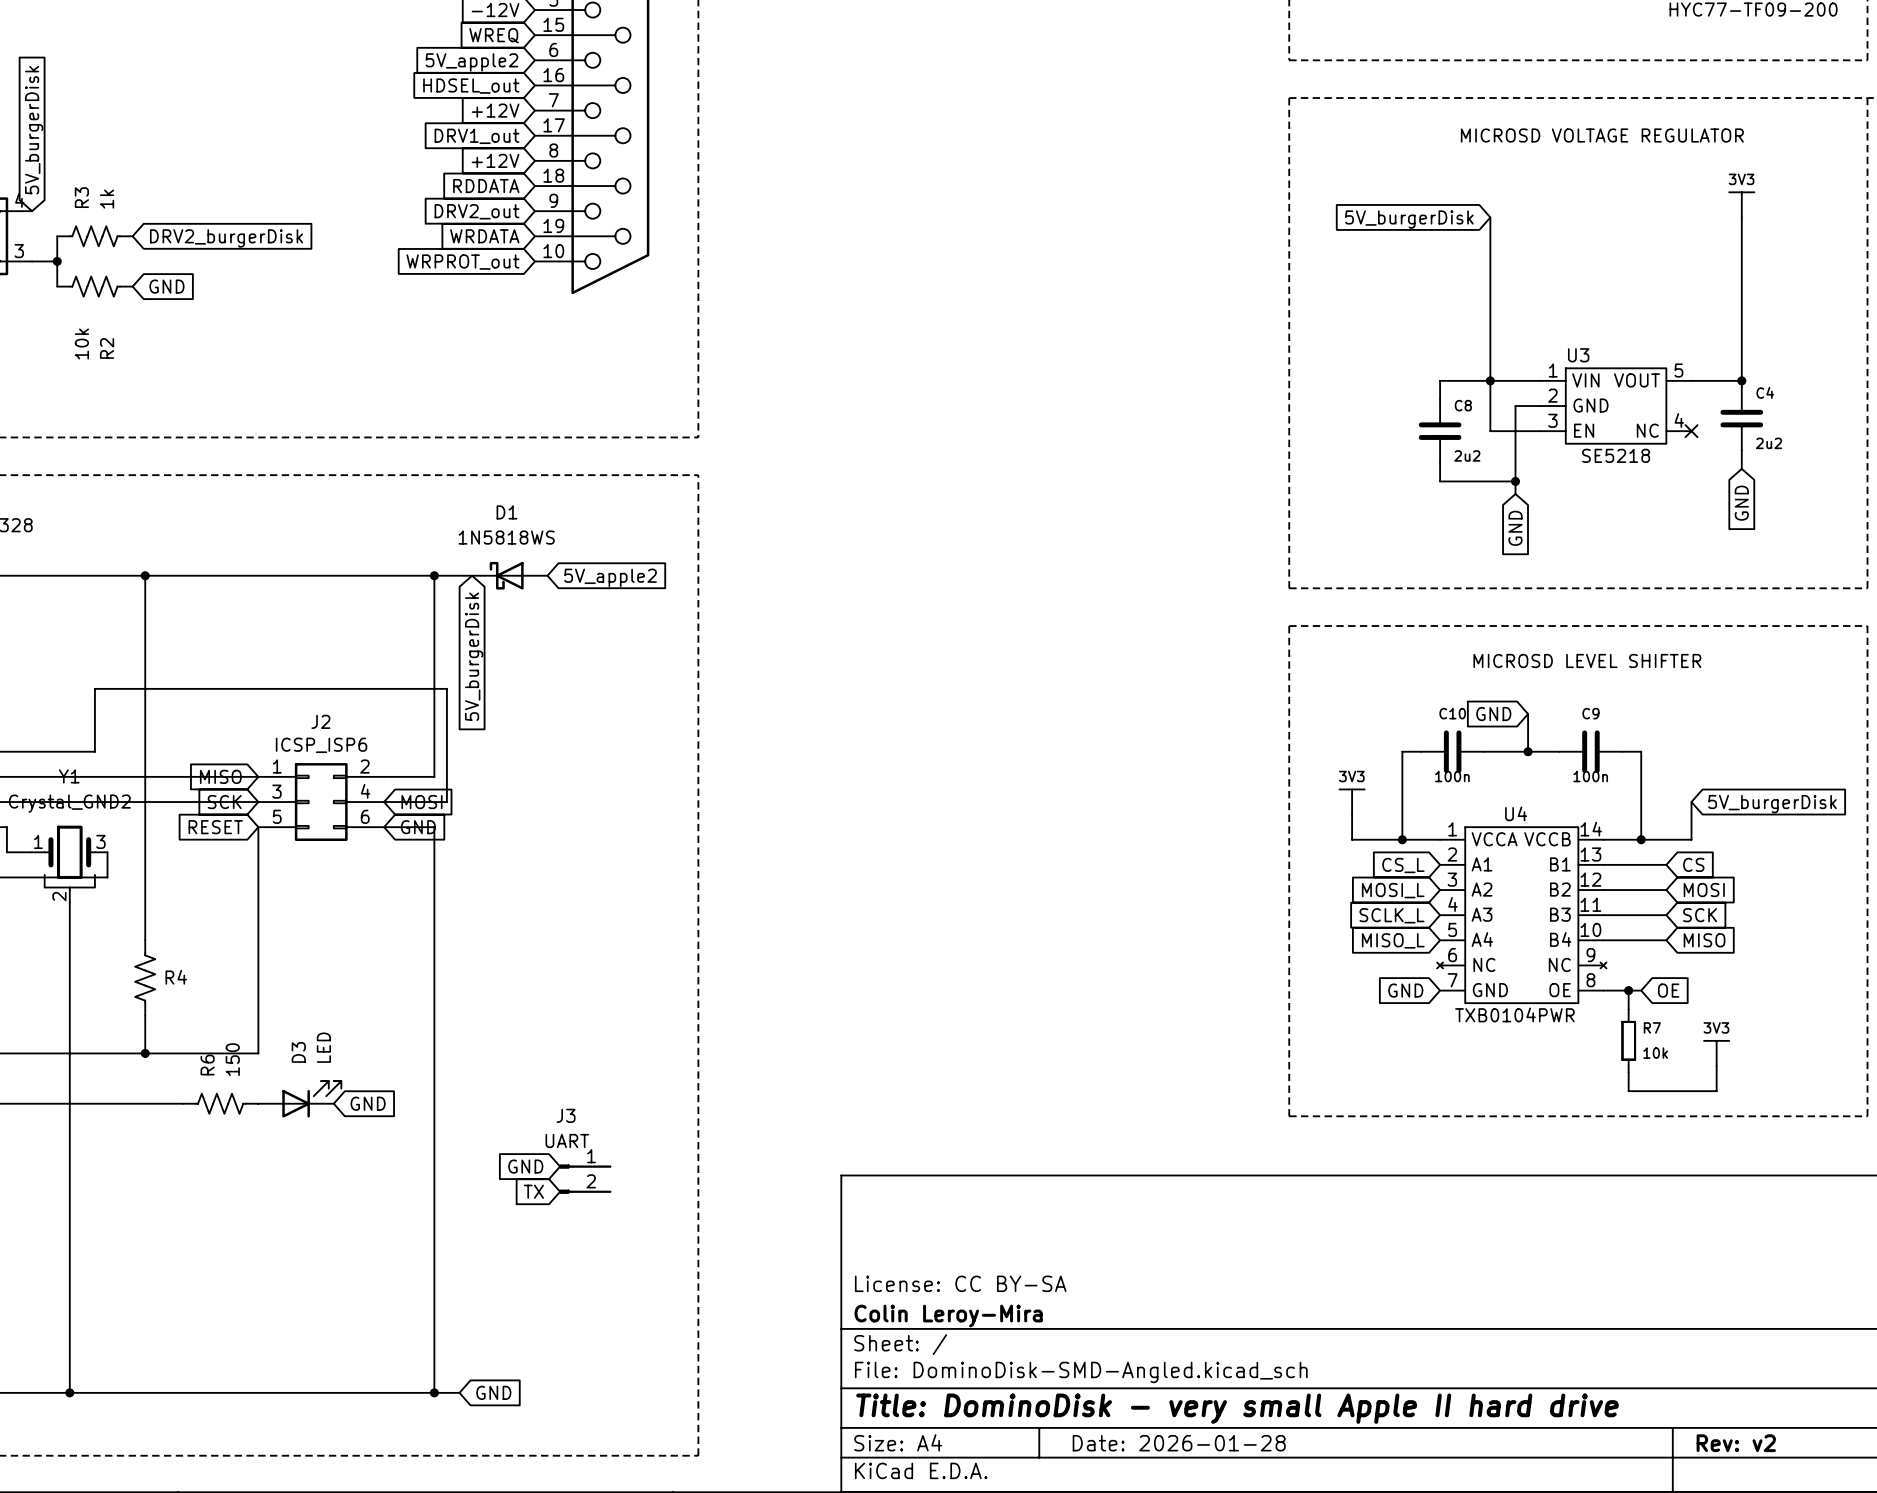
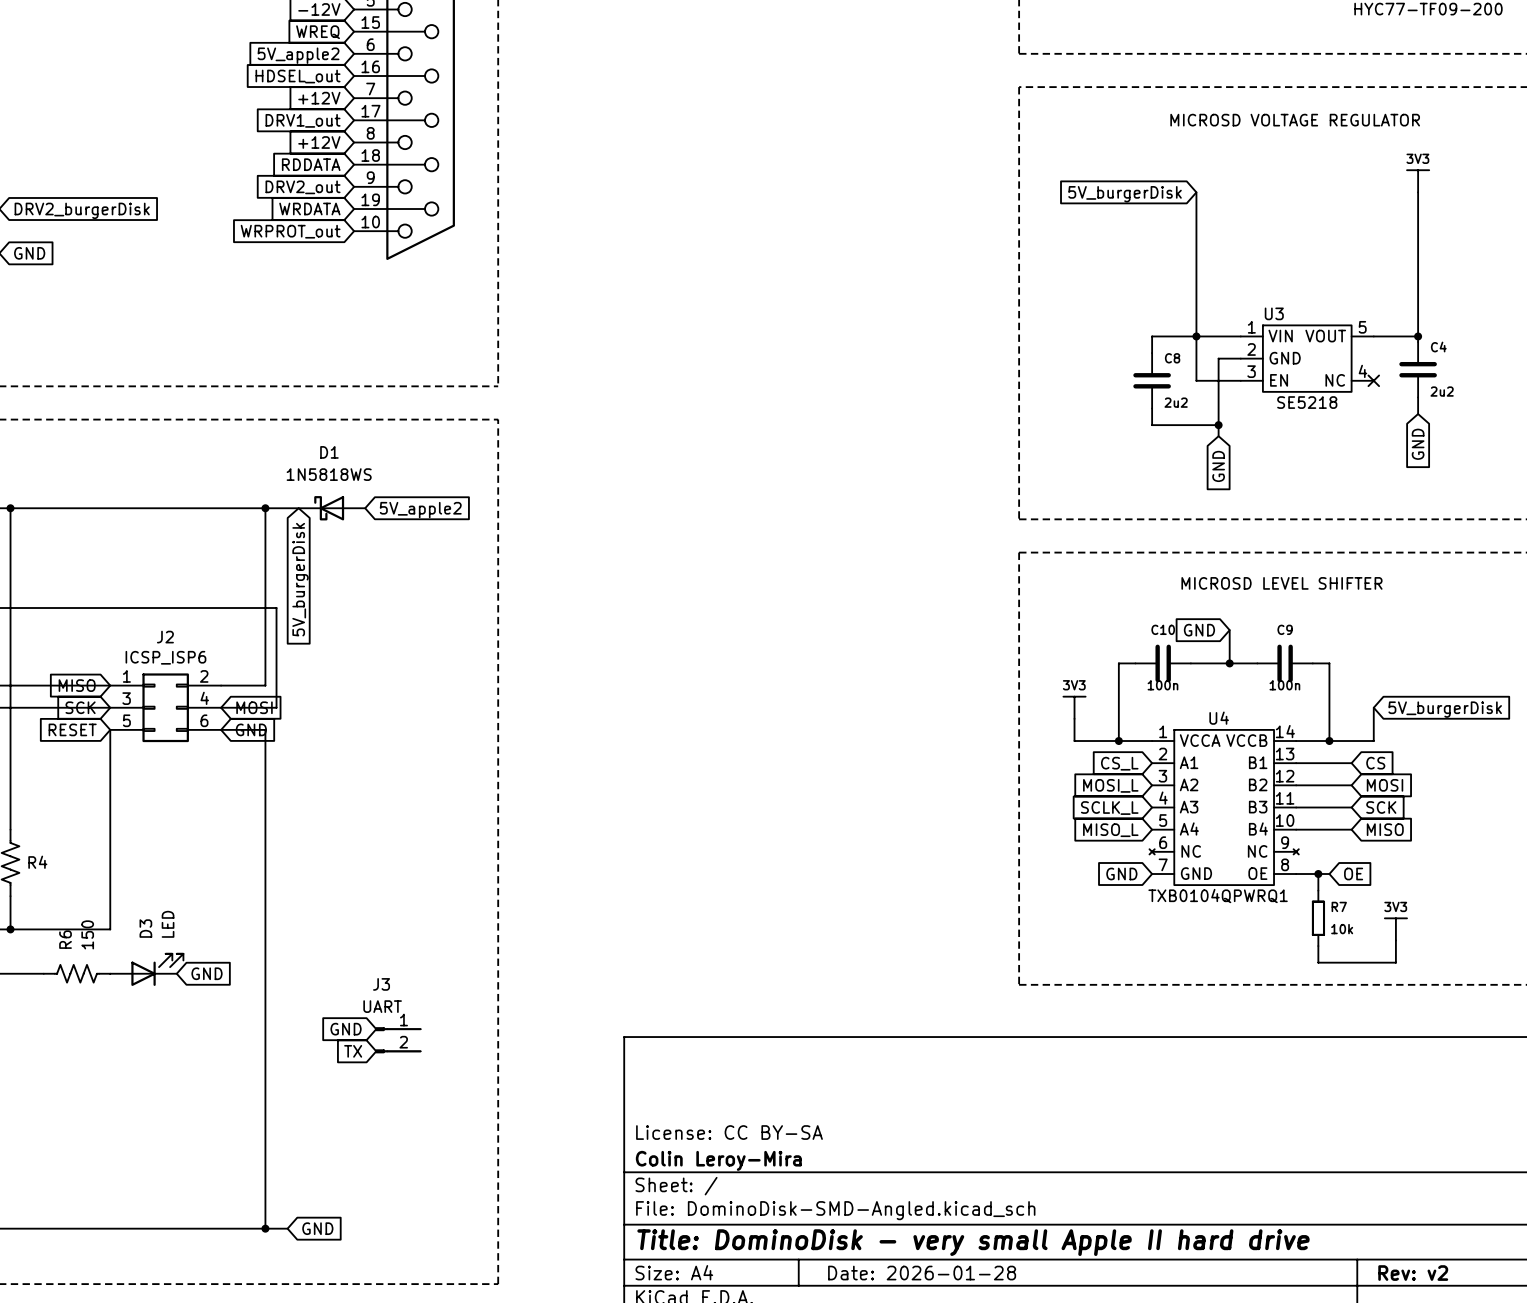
U4 value: TXB0104PWR (1514, 1014) -> TXB0104QPWRQ1 (1218, 896)

